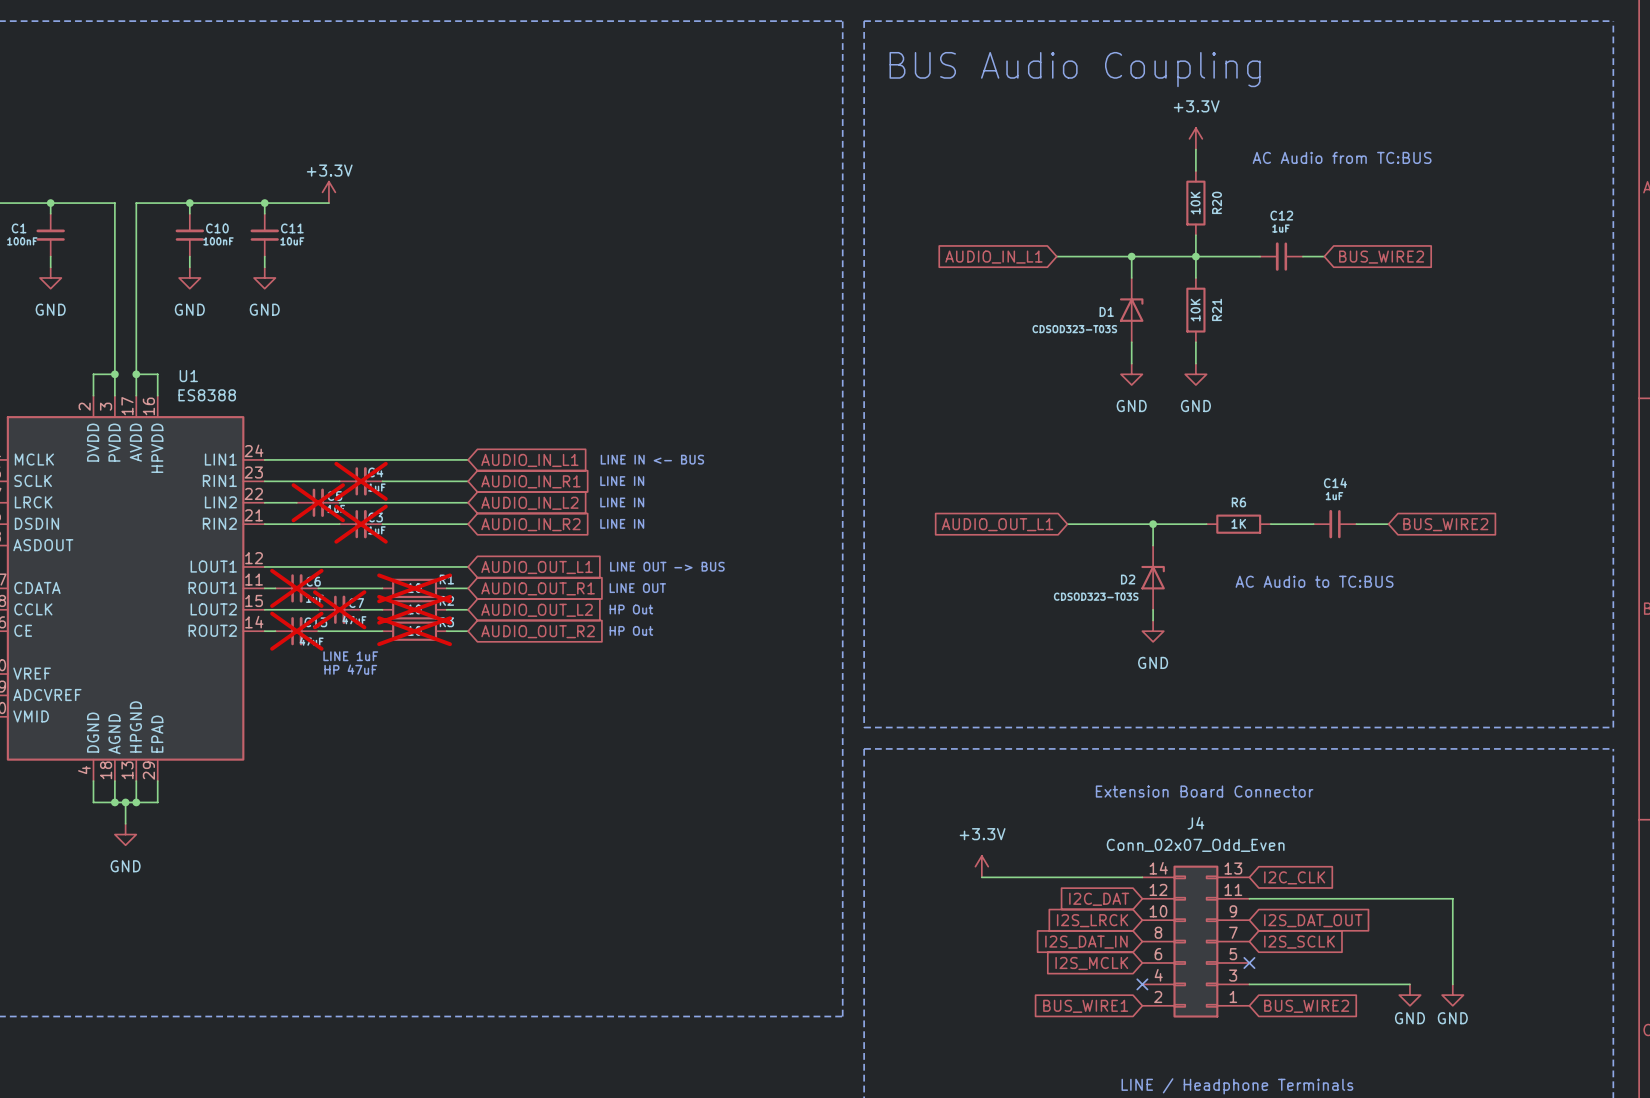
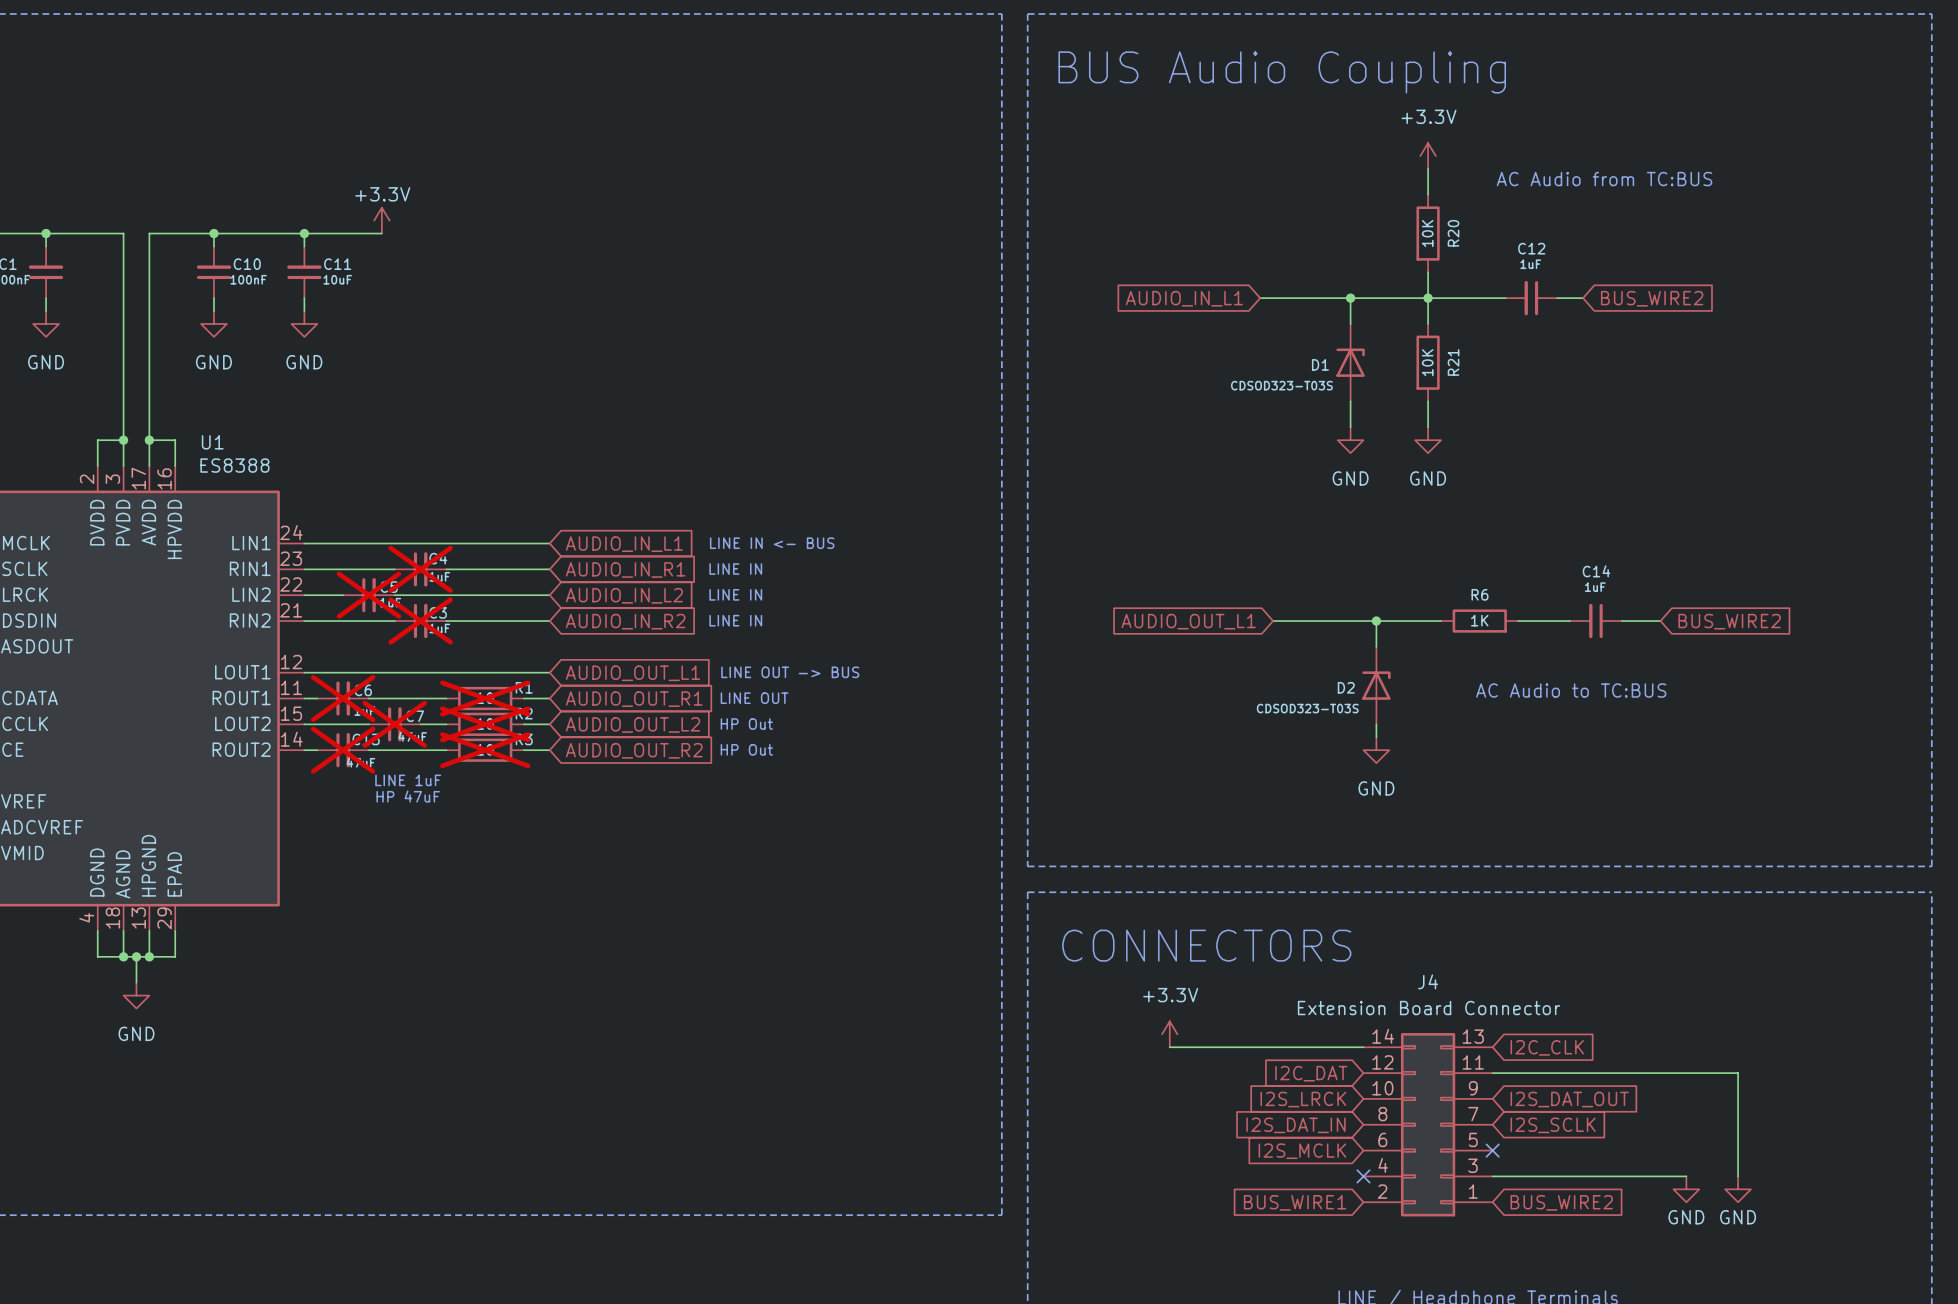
text: Extension Board Connector (1204, 791) -> none
text: none -> CONNECTORS (1206, 945)
J4 value: Conn_02x07_Odd_Even (1195, 845) -> Extension Board Connector (1429, 1008)

